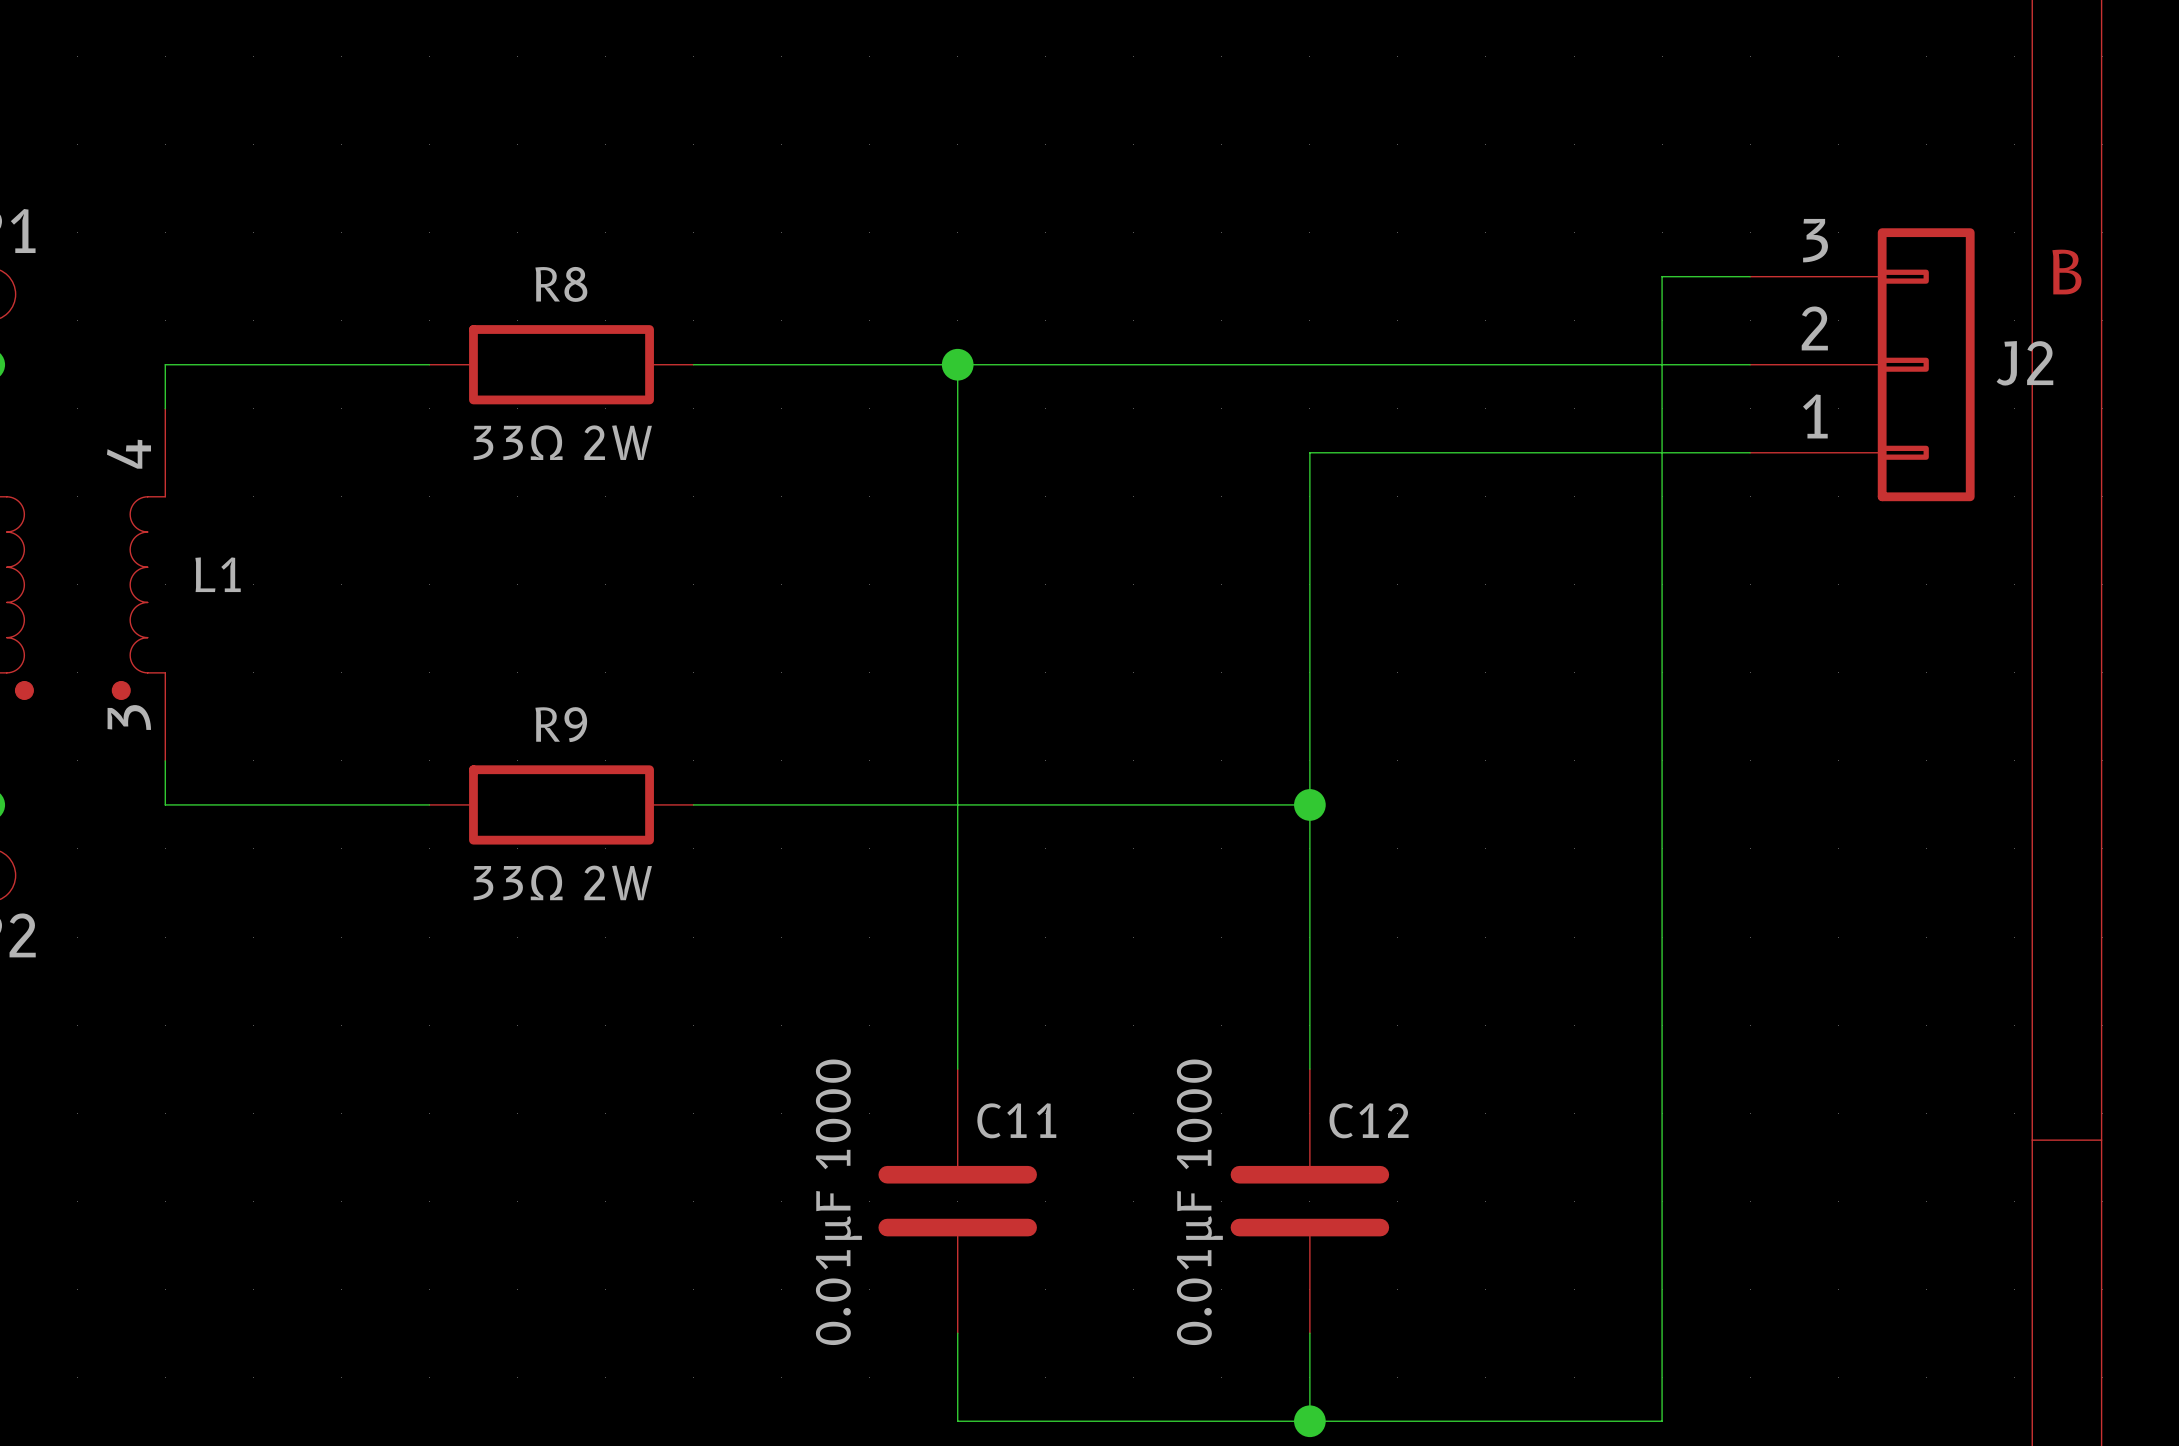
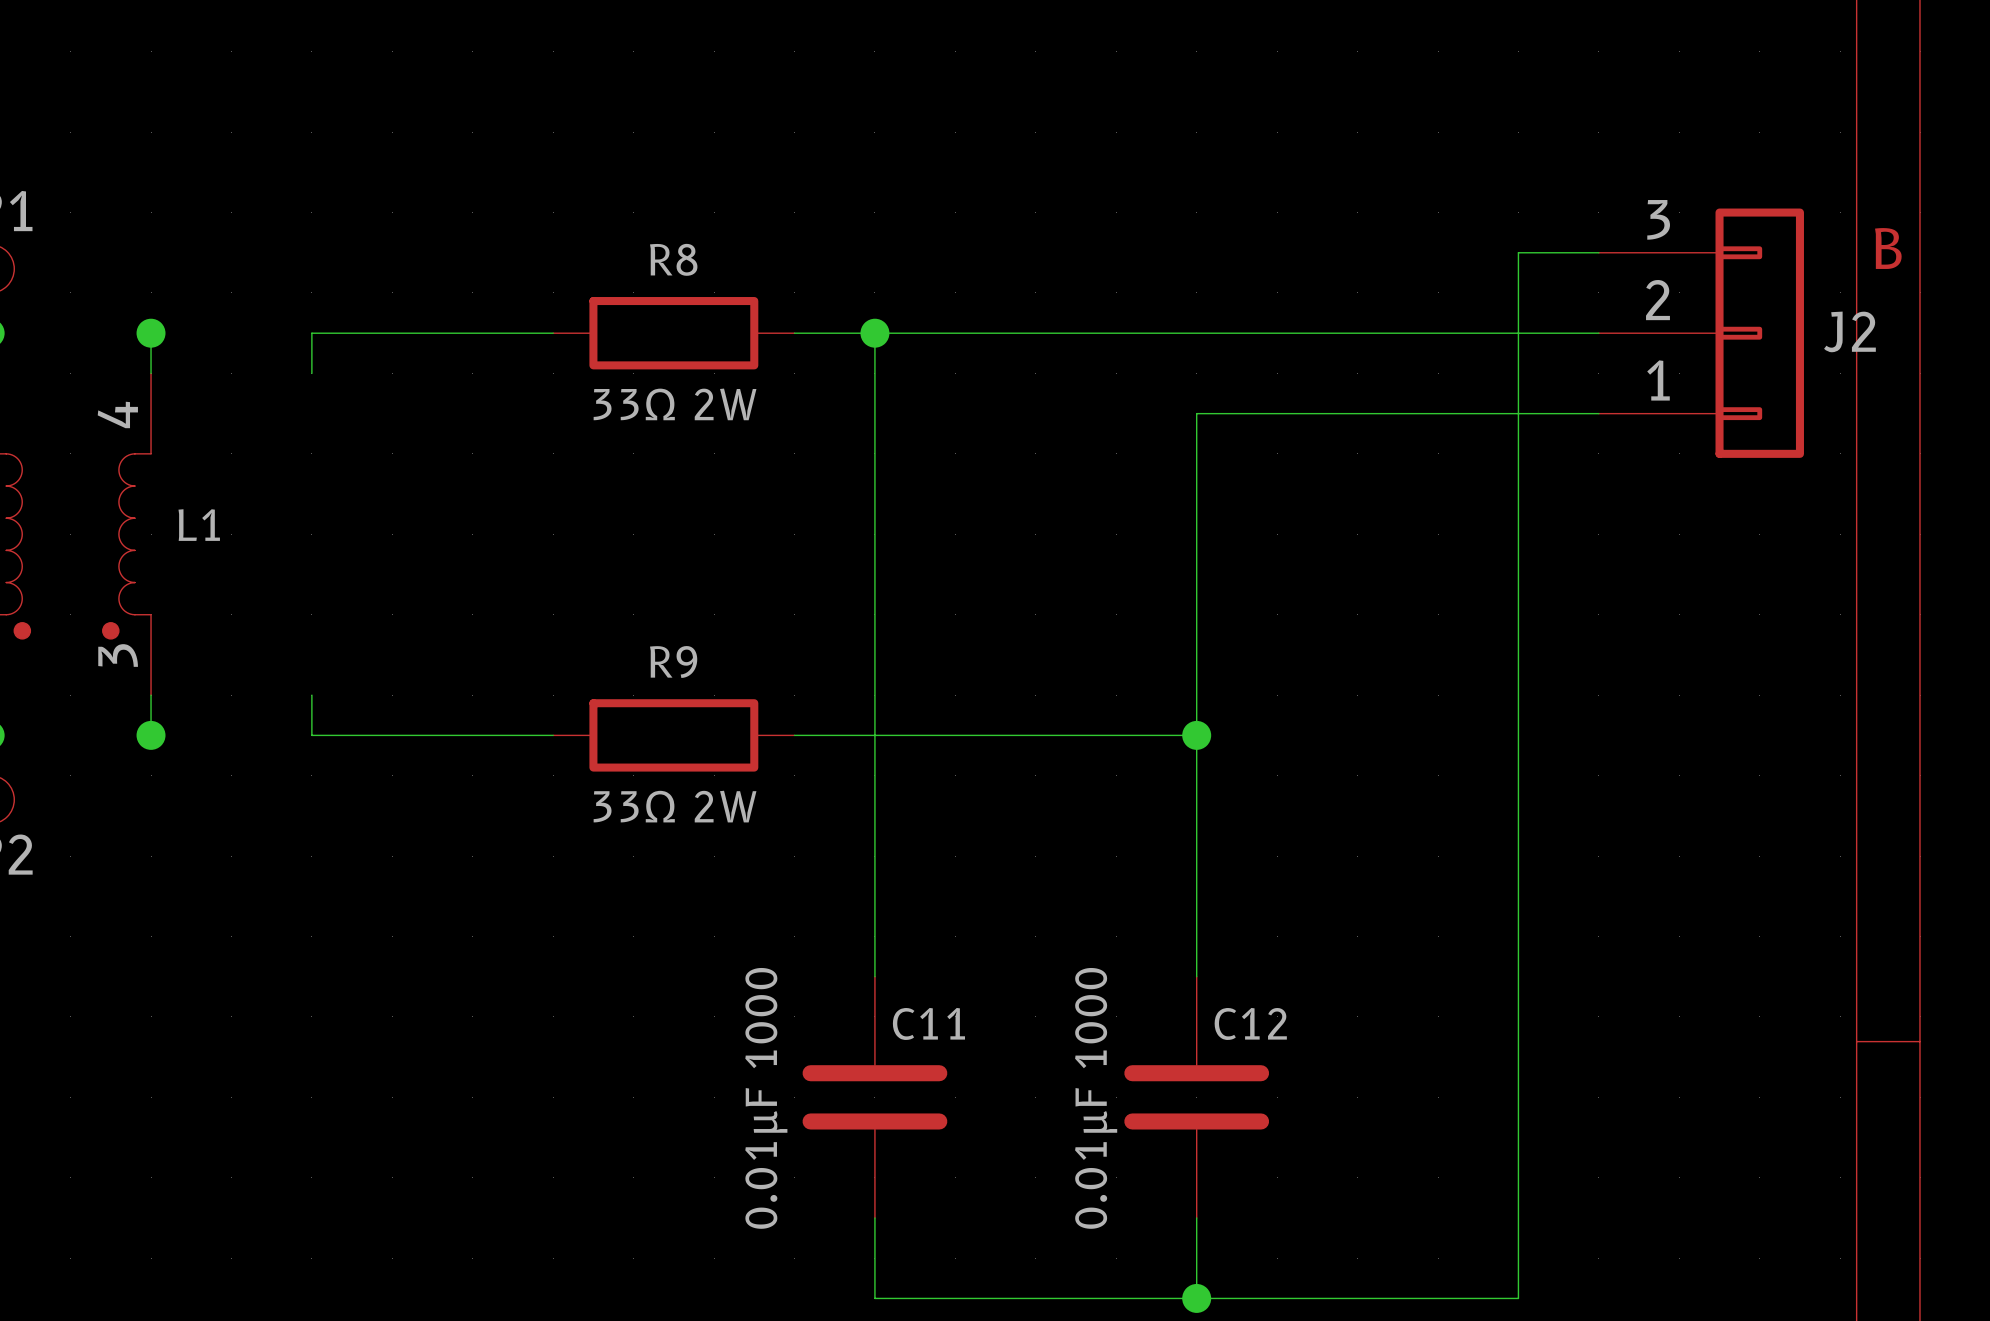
wire: (165, 364) (341, 364) -> (311, 373) (311, 333)
junction: none -> (151, 333)
R8 position: (561, 364) -> (673, 333)
wire: (693, 364) (869, 364) -> (392, 333) (553, 333)
wire: (165, 804) (341, 804) -> (311, 695) (311, 735)
junction: none -> (151, 735)
R9 position: (561, 804) -> (673, 735)
wire: (693, 804) (869, 804) -> (392, 735) (553, 735)

